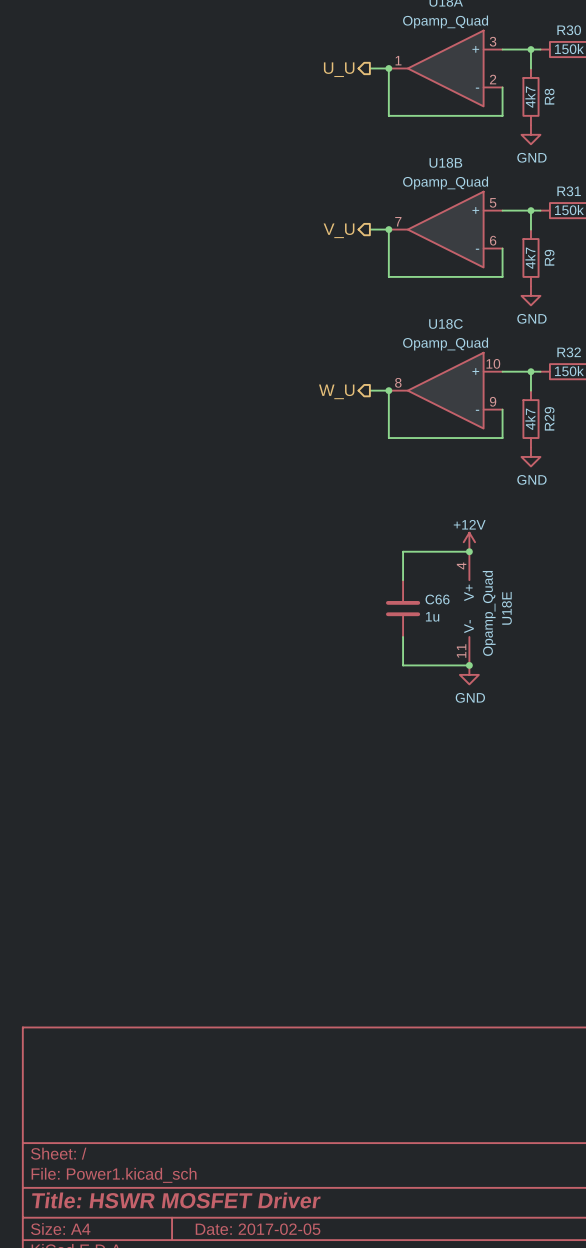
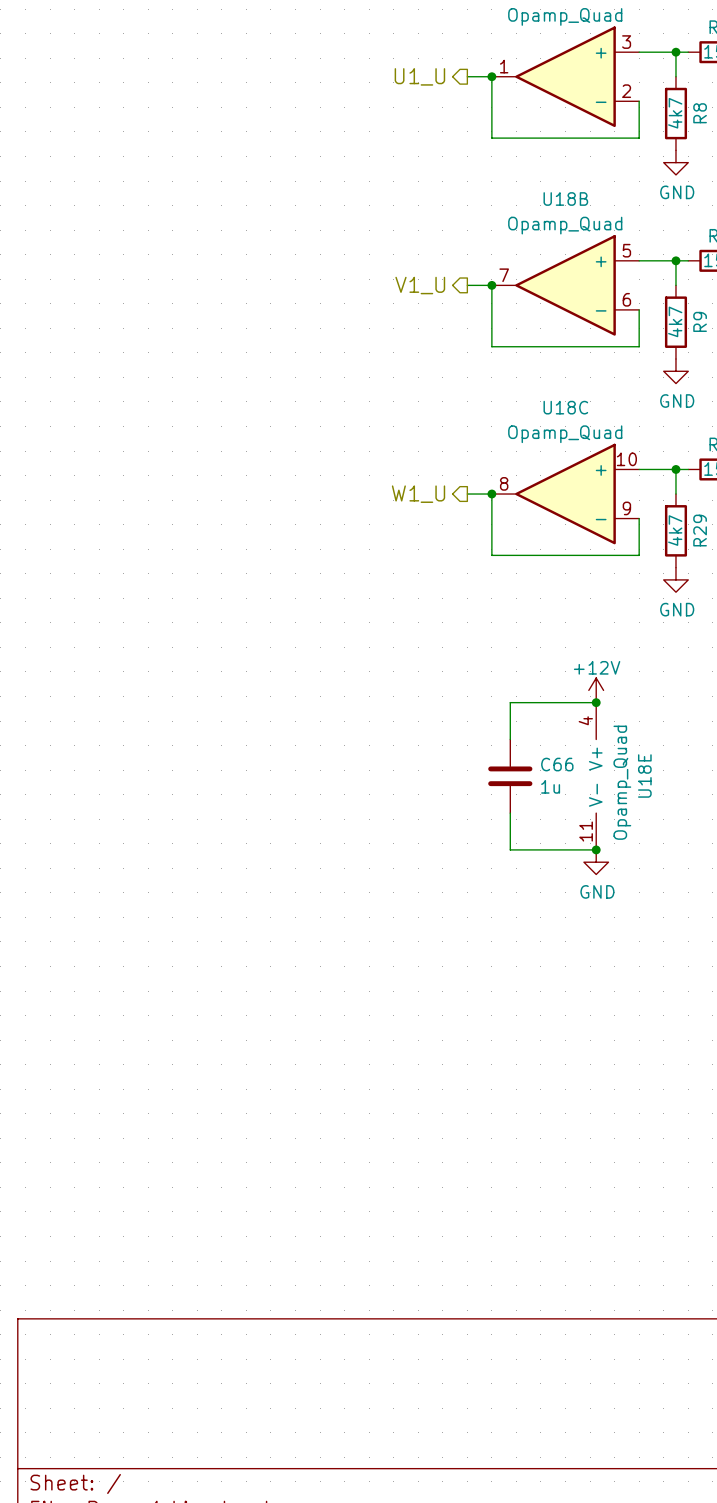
hierarchical label: U_U (339, 69) -> U1_U (419, 76)
hierarchical label: V_U (339, 230) -> V1_U (420, 285)
hierarchical label: W_U (336, 391) -> W1_U (418, 494)

